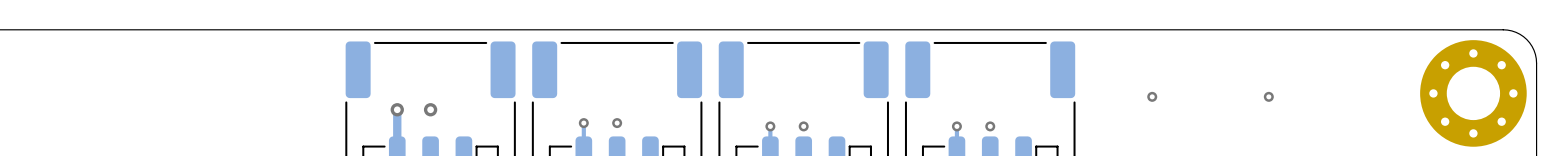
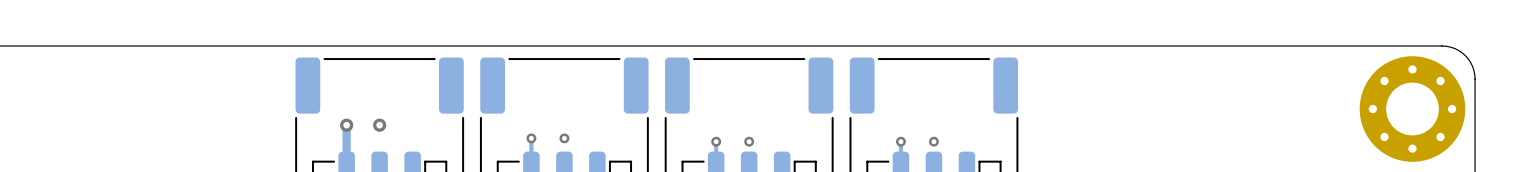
via: (1152, 96) -> none
via: (1268, 96) -> none

